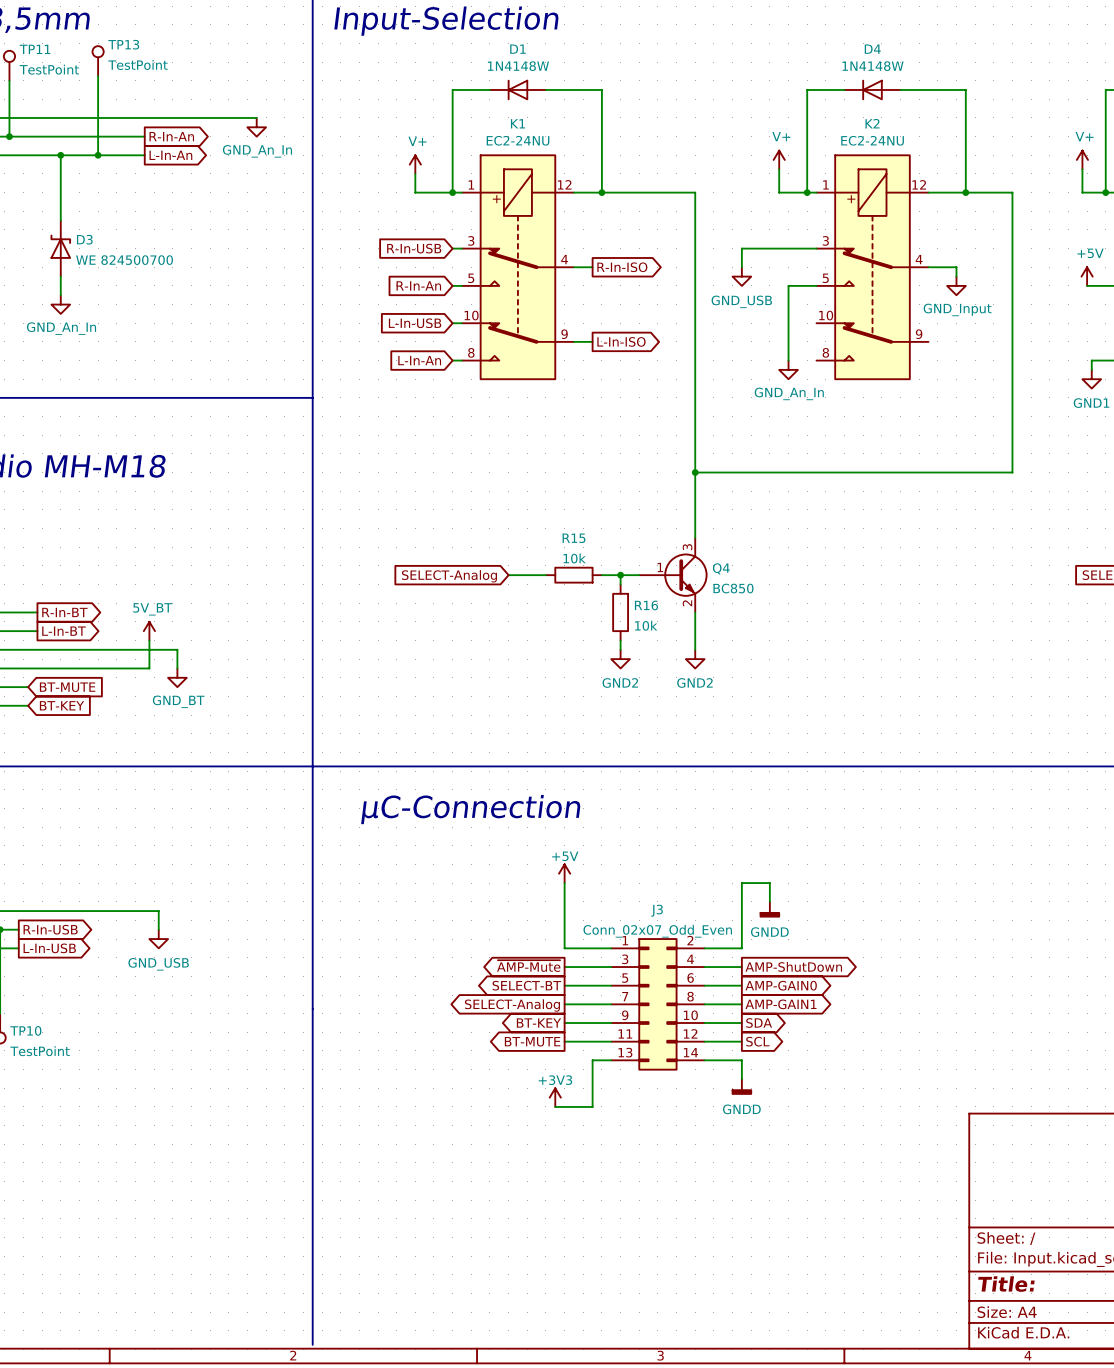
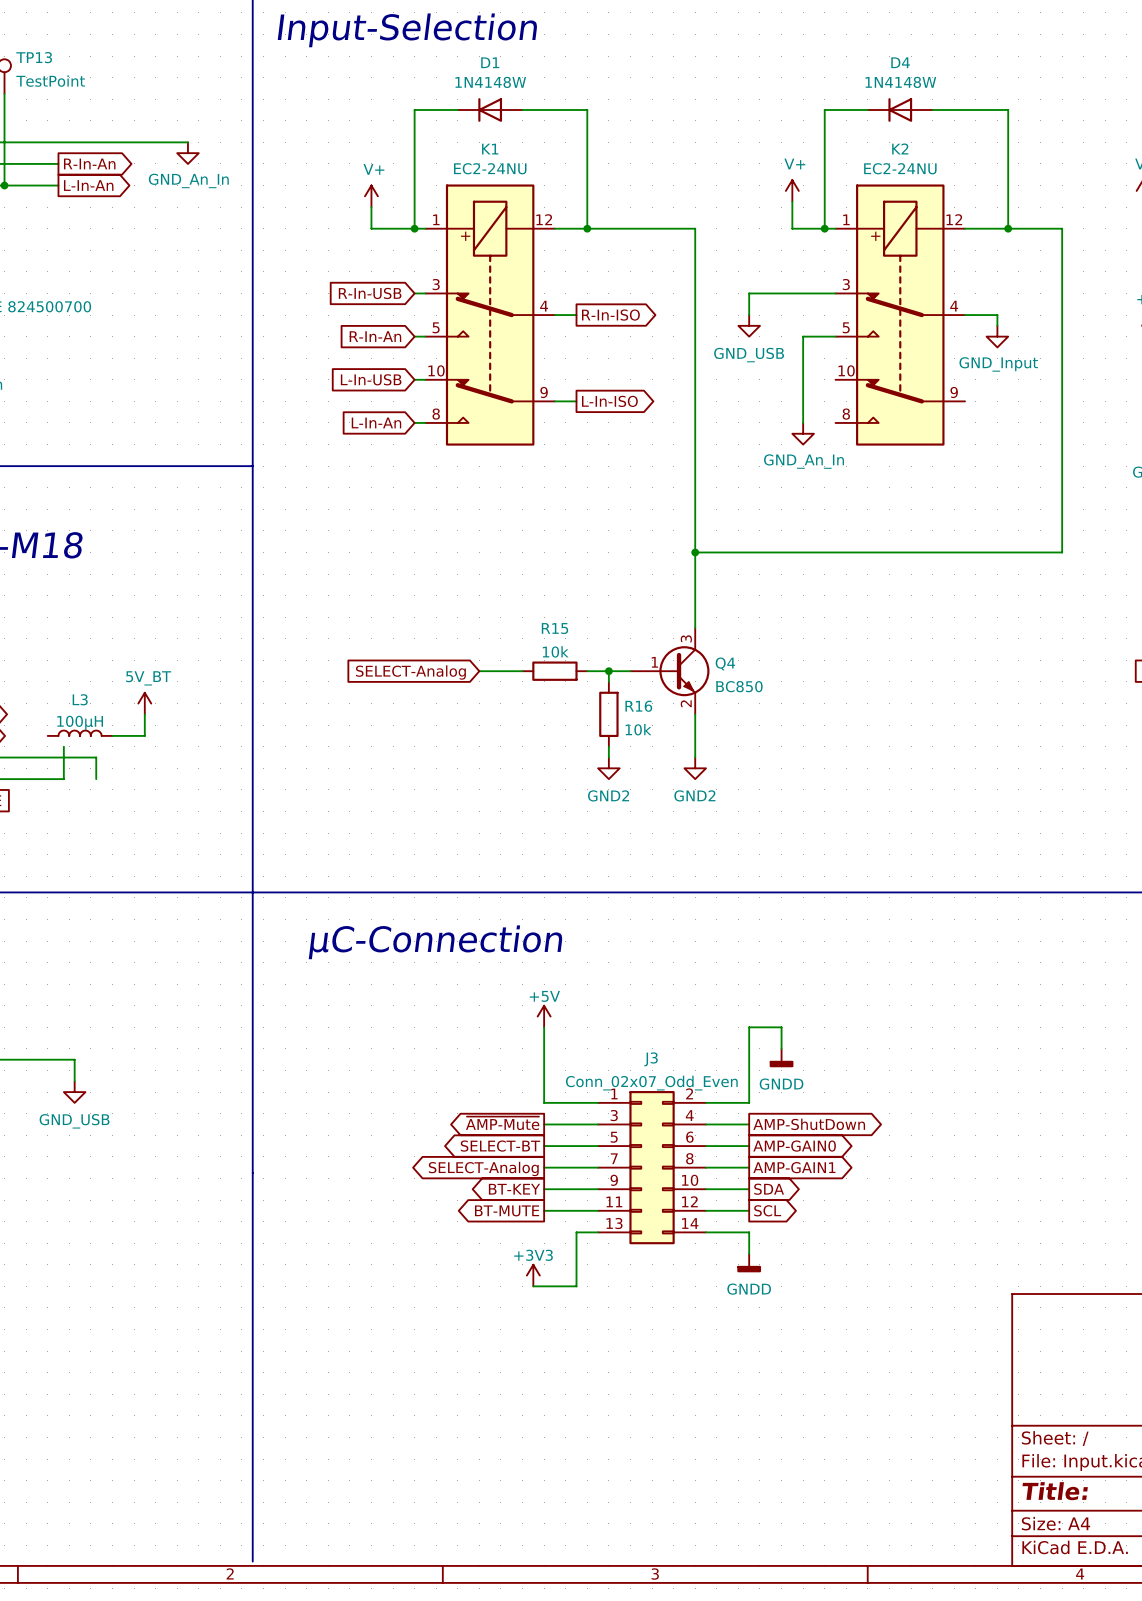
wire: none -> (144, 714) (144, 735) (112, 735)
L3: none -> 100µH (80, 733)
power symbol position: 5V_BT (149, 631) -> 5V_BT (144, 703)
power symbol: GND_BT (177, 677) -> none

